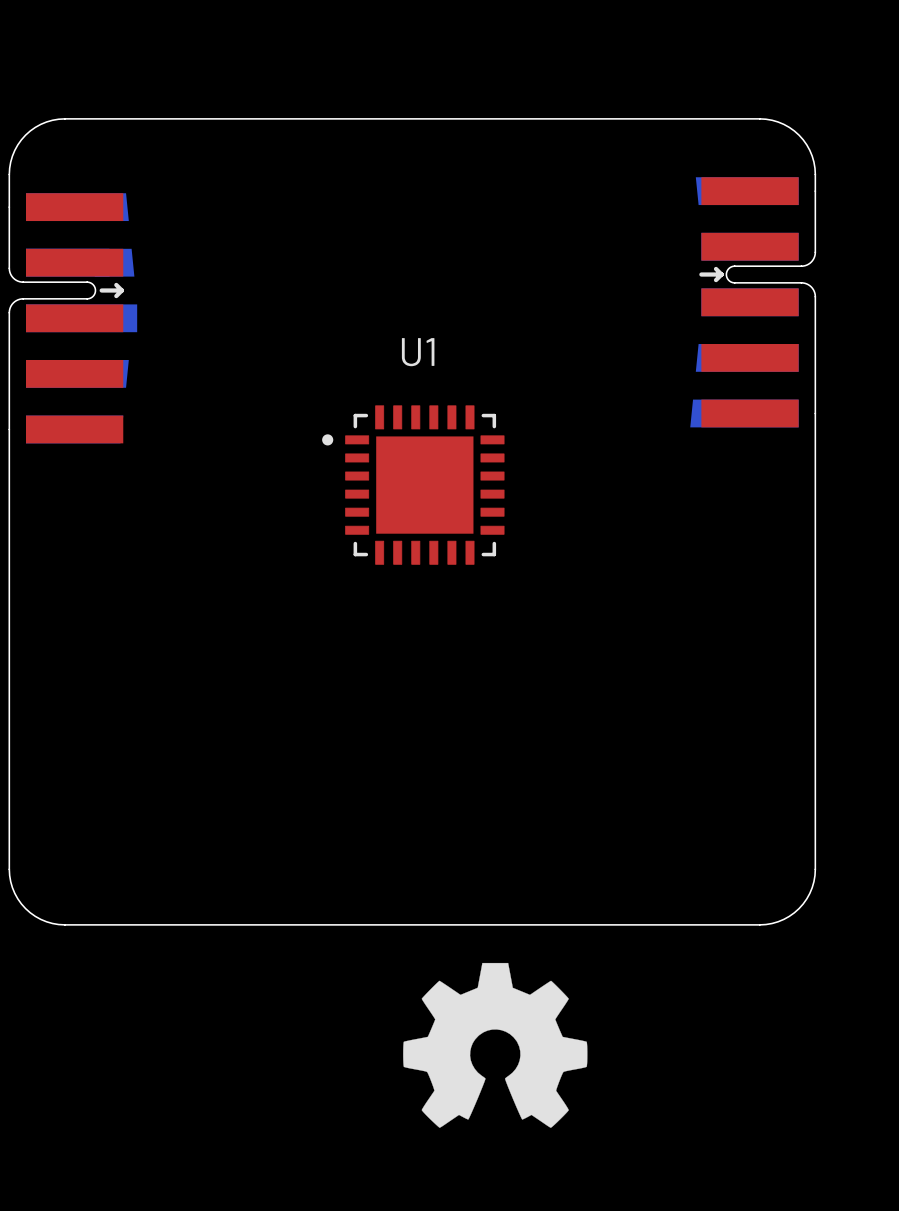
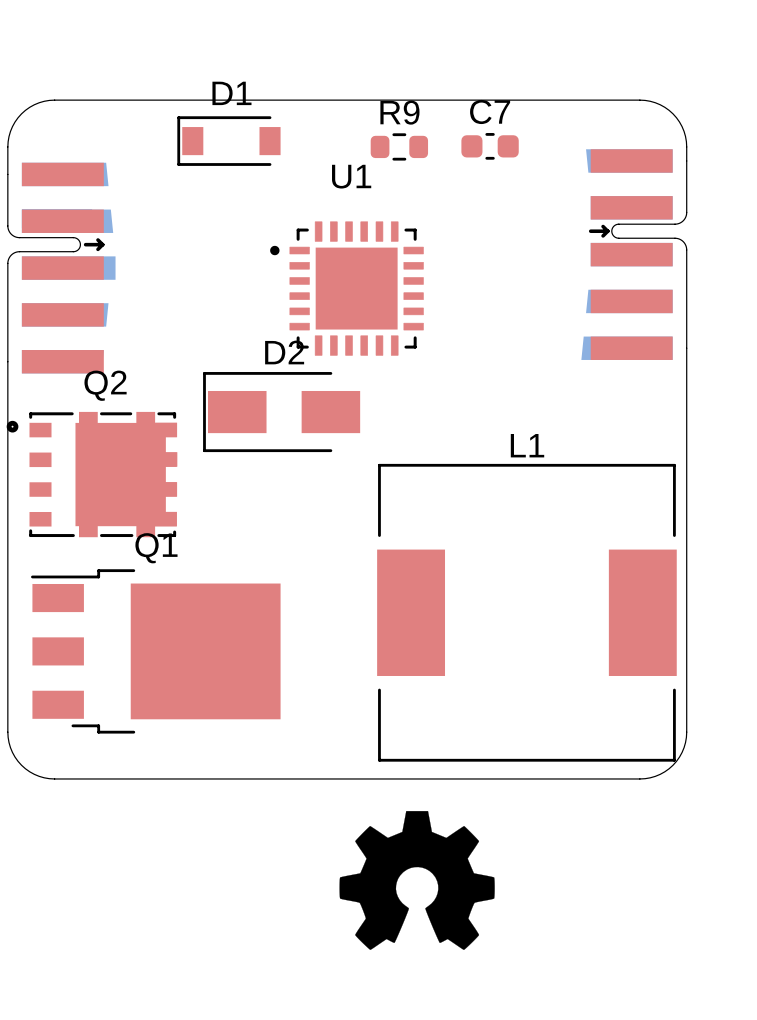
D1: none -> (228, 141)
C7: none -> (490, 146)
R9: none -> (399, 146)
U1 position: (413, 485) -> (346, 288)
D2: none -> (281, 412)
Q2: none -> (92, 474)
L1: none -> (526, 612)
Q1: none -> (155, 651)

